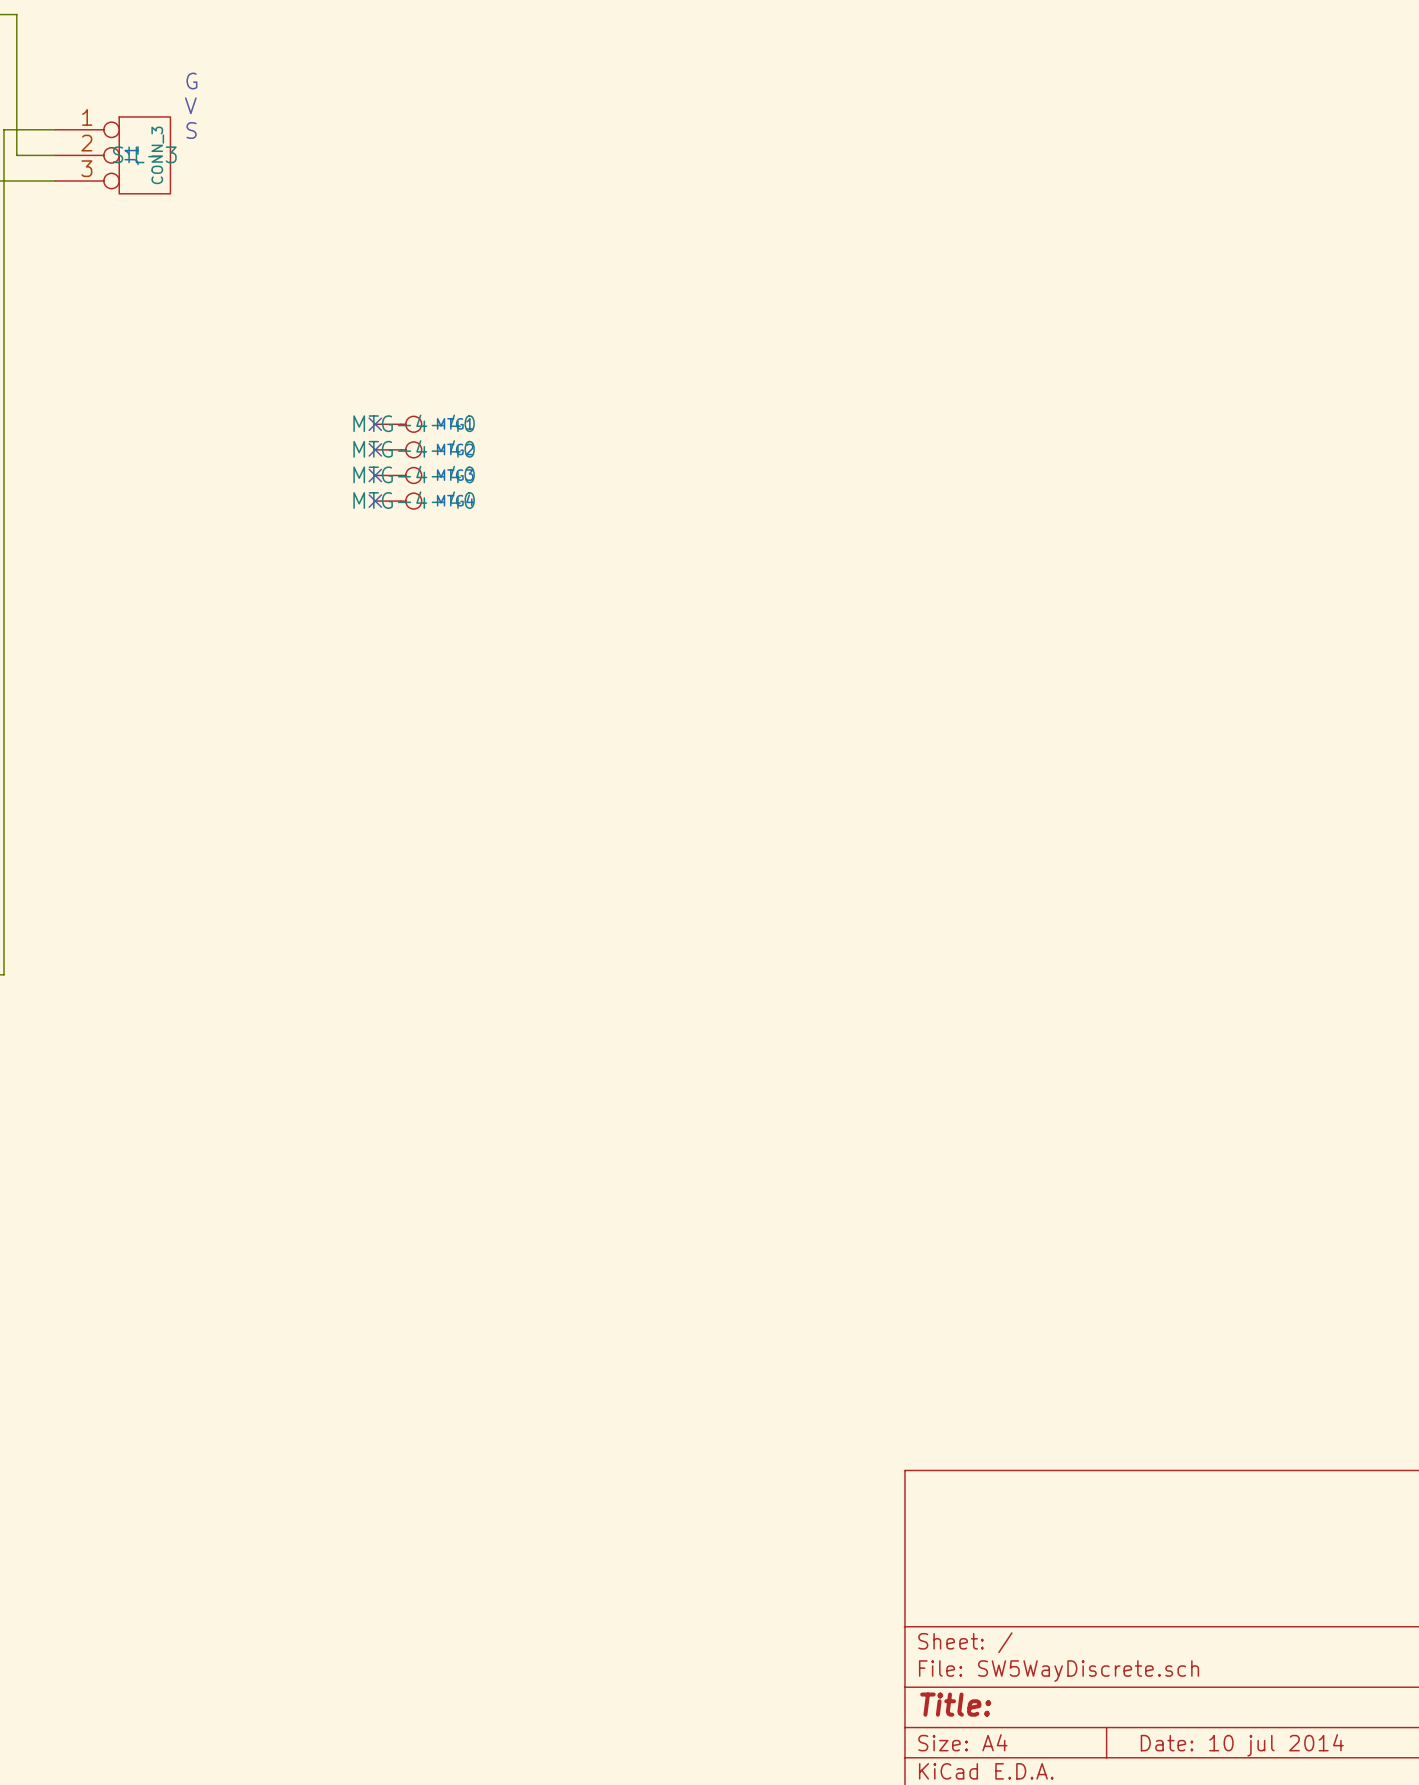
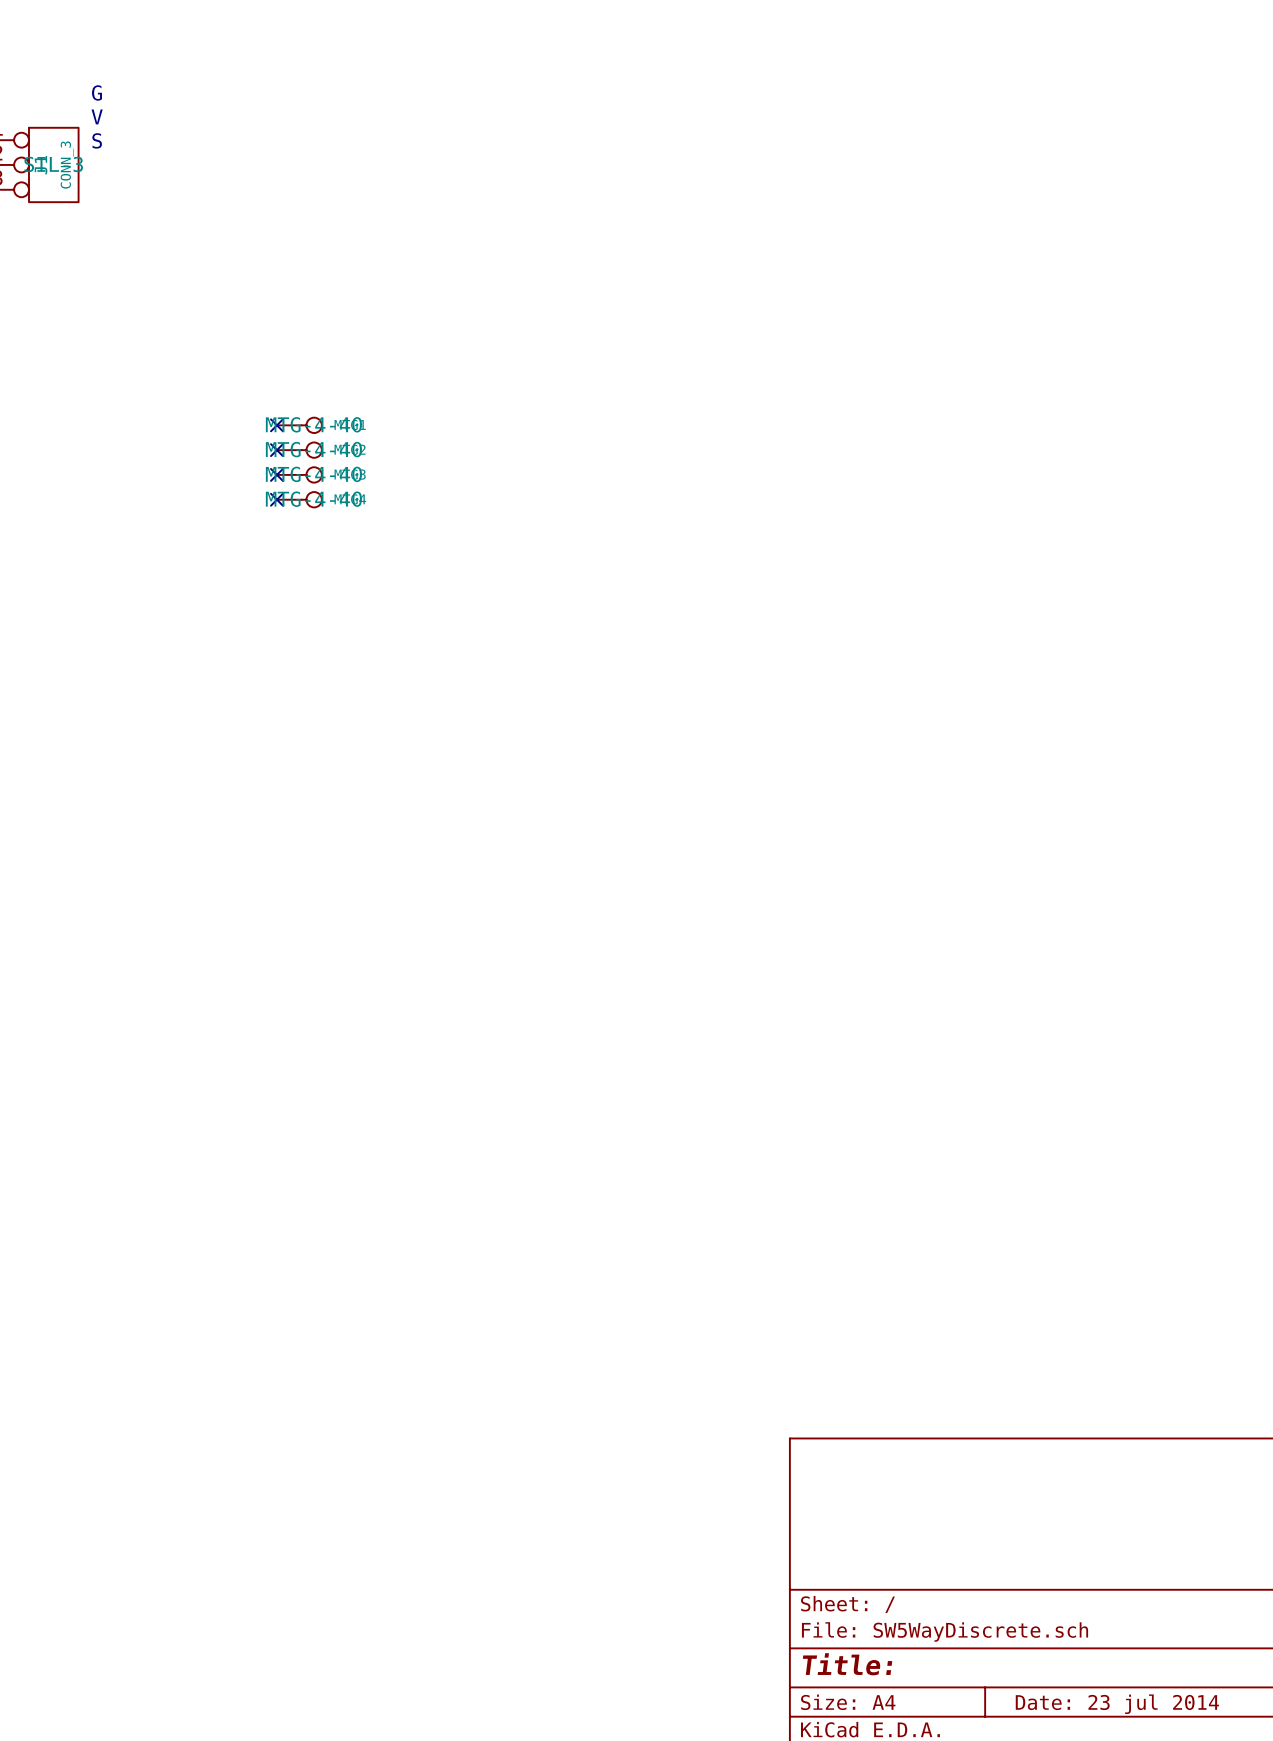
title block: Date: 10 jul 2014 (1242, 1745) -> Date: 23 jul 2014 (1117, 1704)

